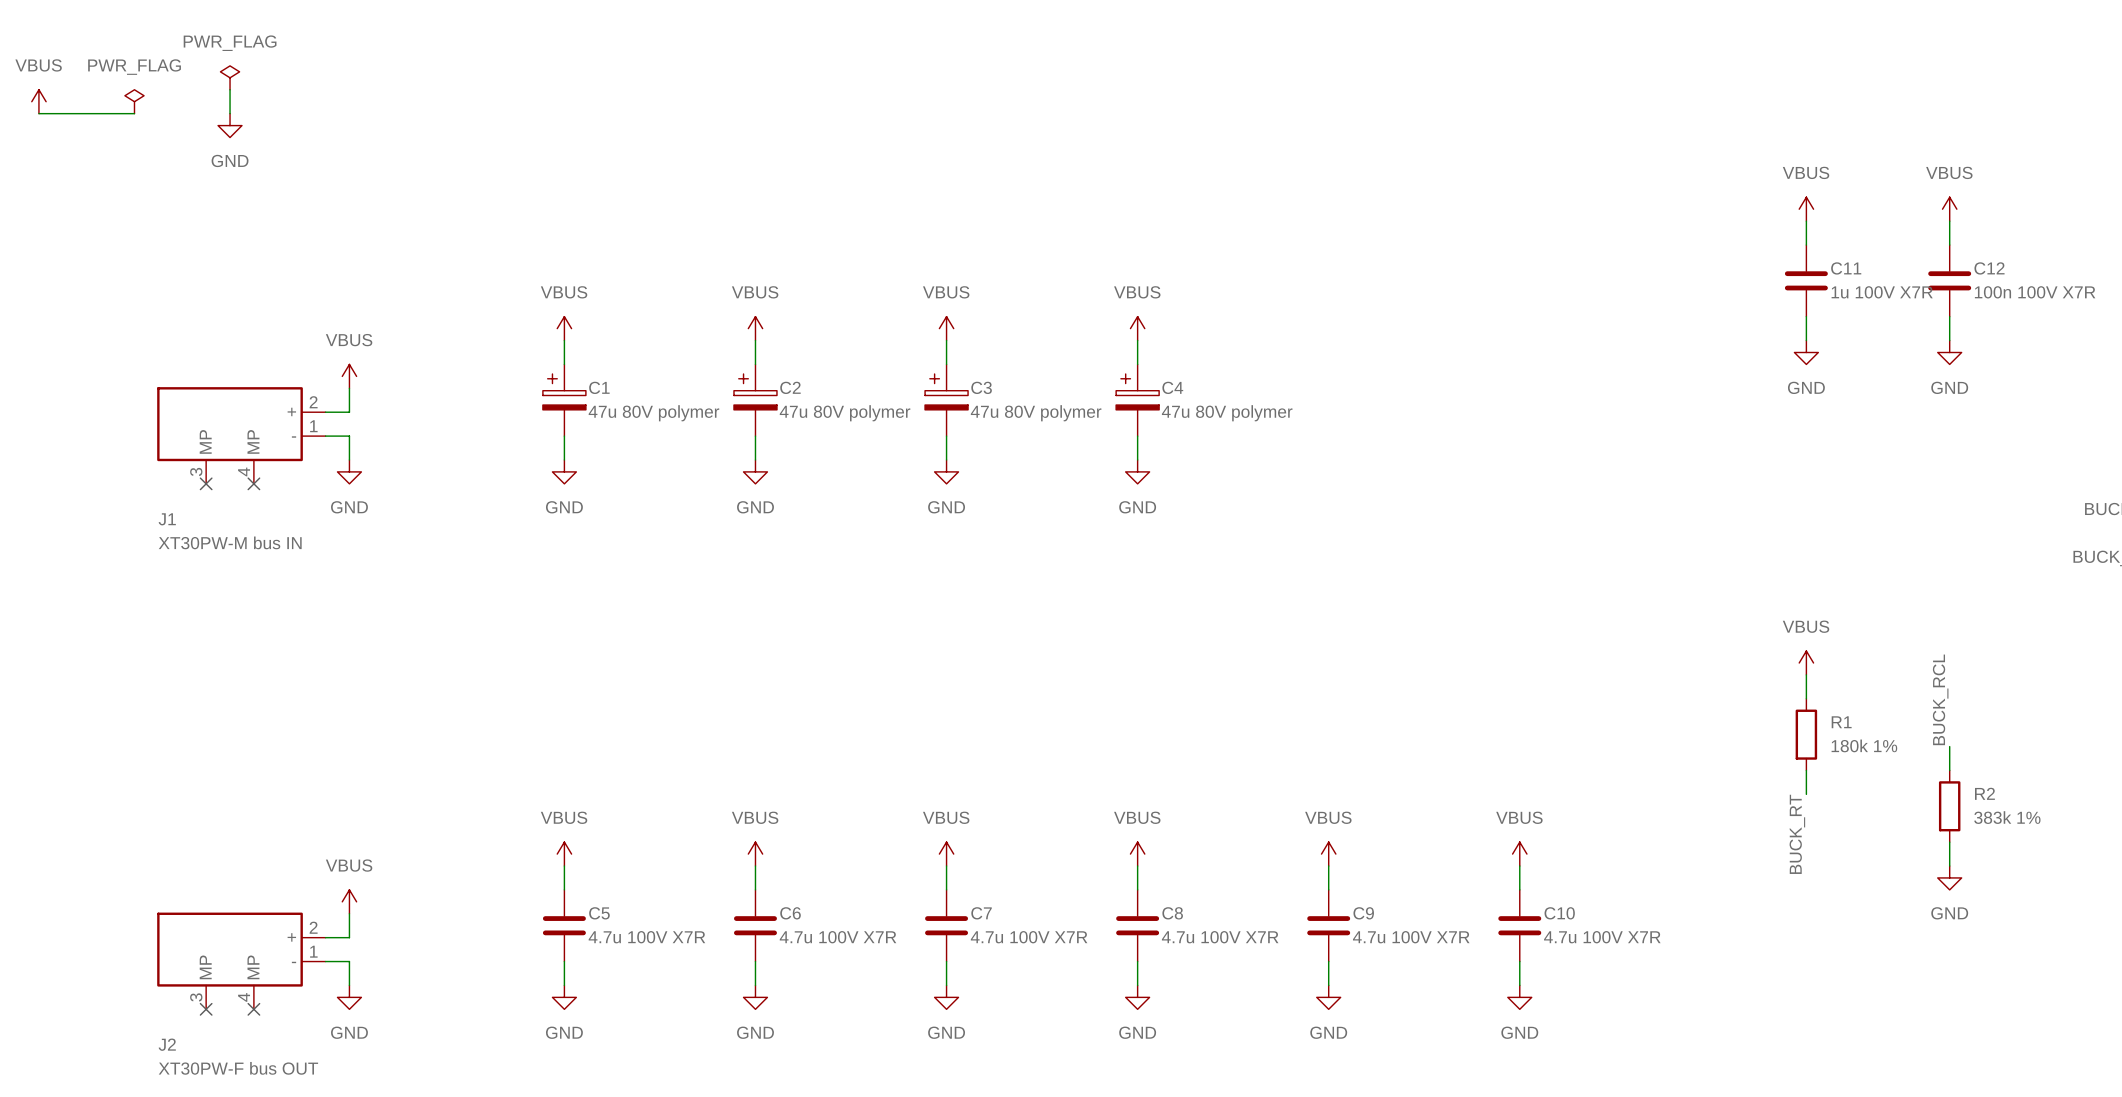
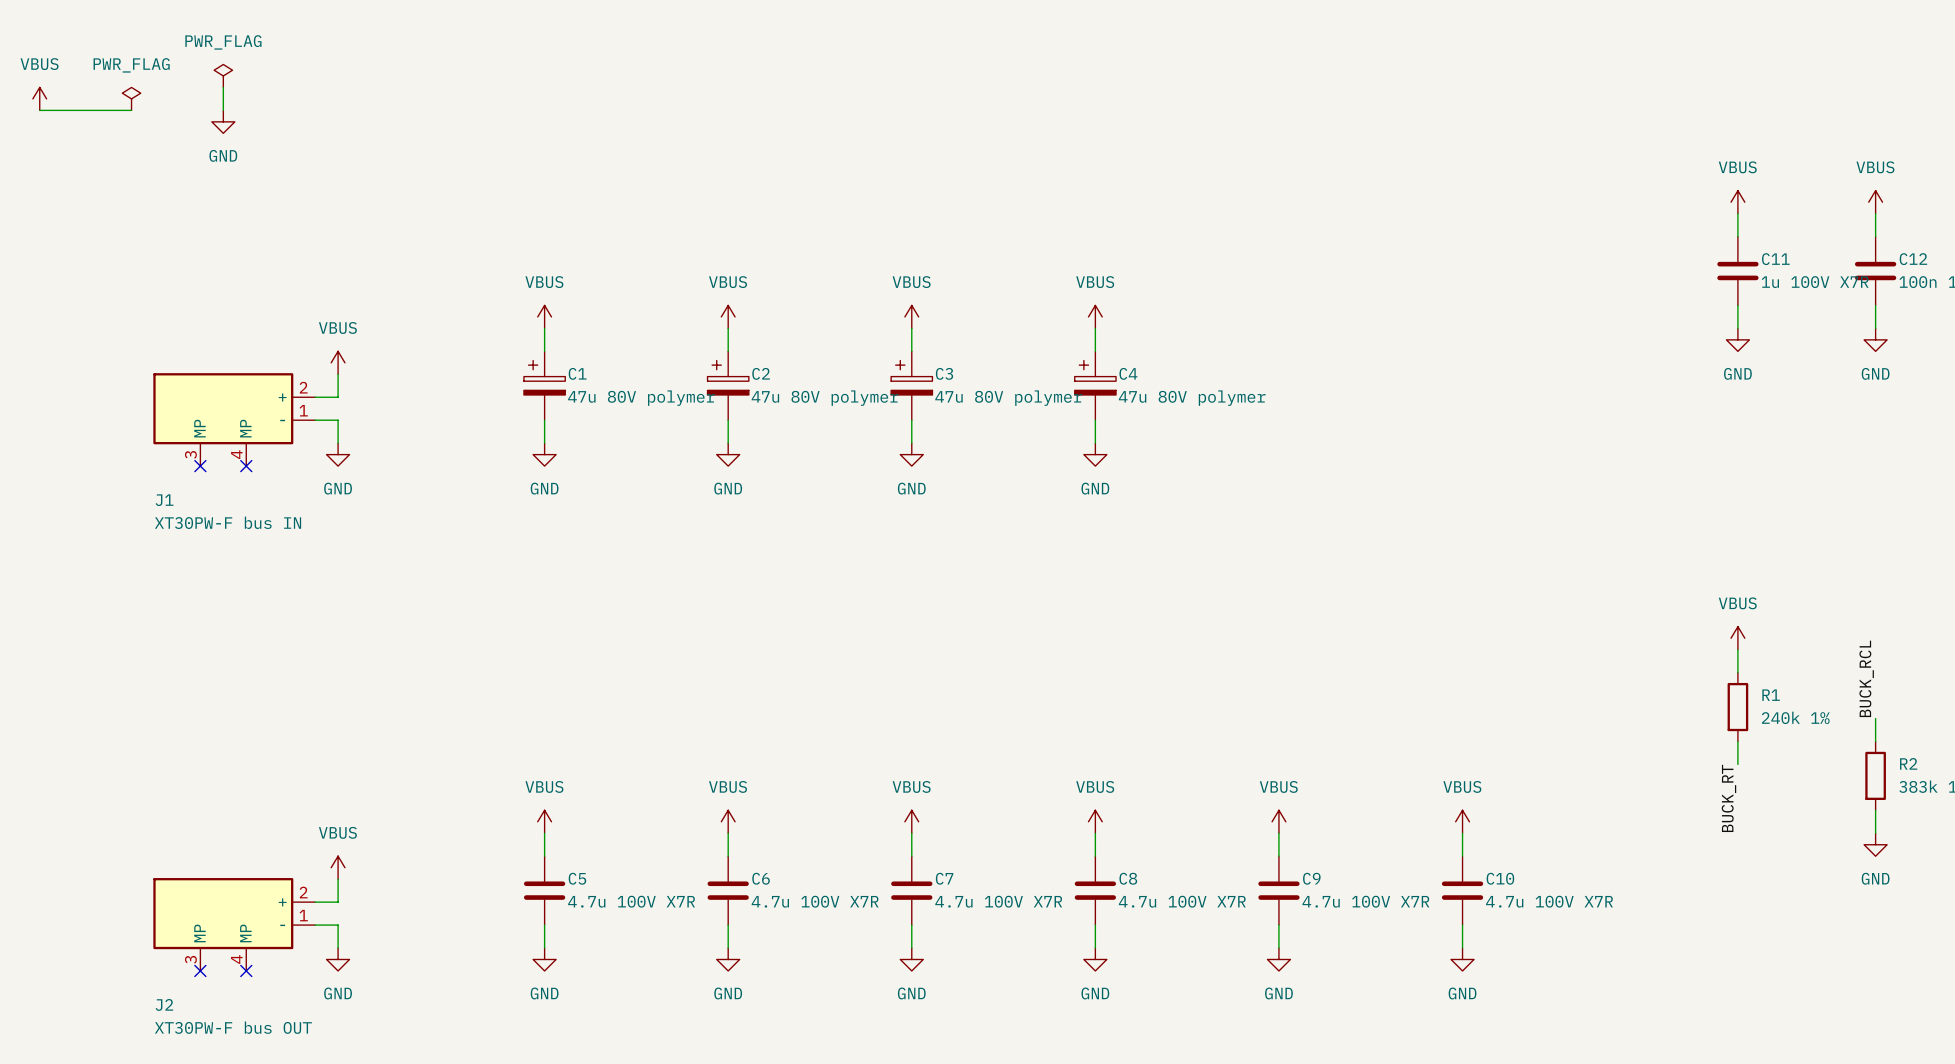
J1 value: XT30PW-M bus IN (230, 542) -> XT30PW-F bus IN (228, 522)
R1 value: 180k 1% (1864, 745) -> 240k 1% (1795, 717)

